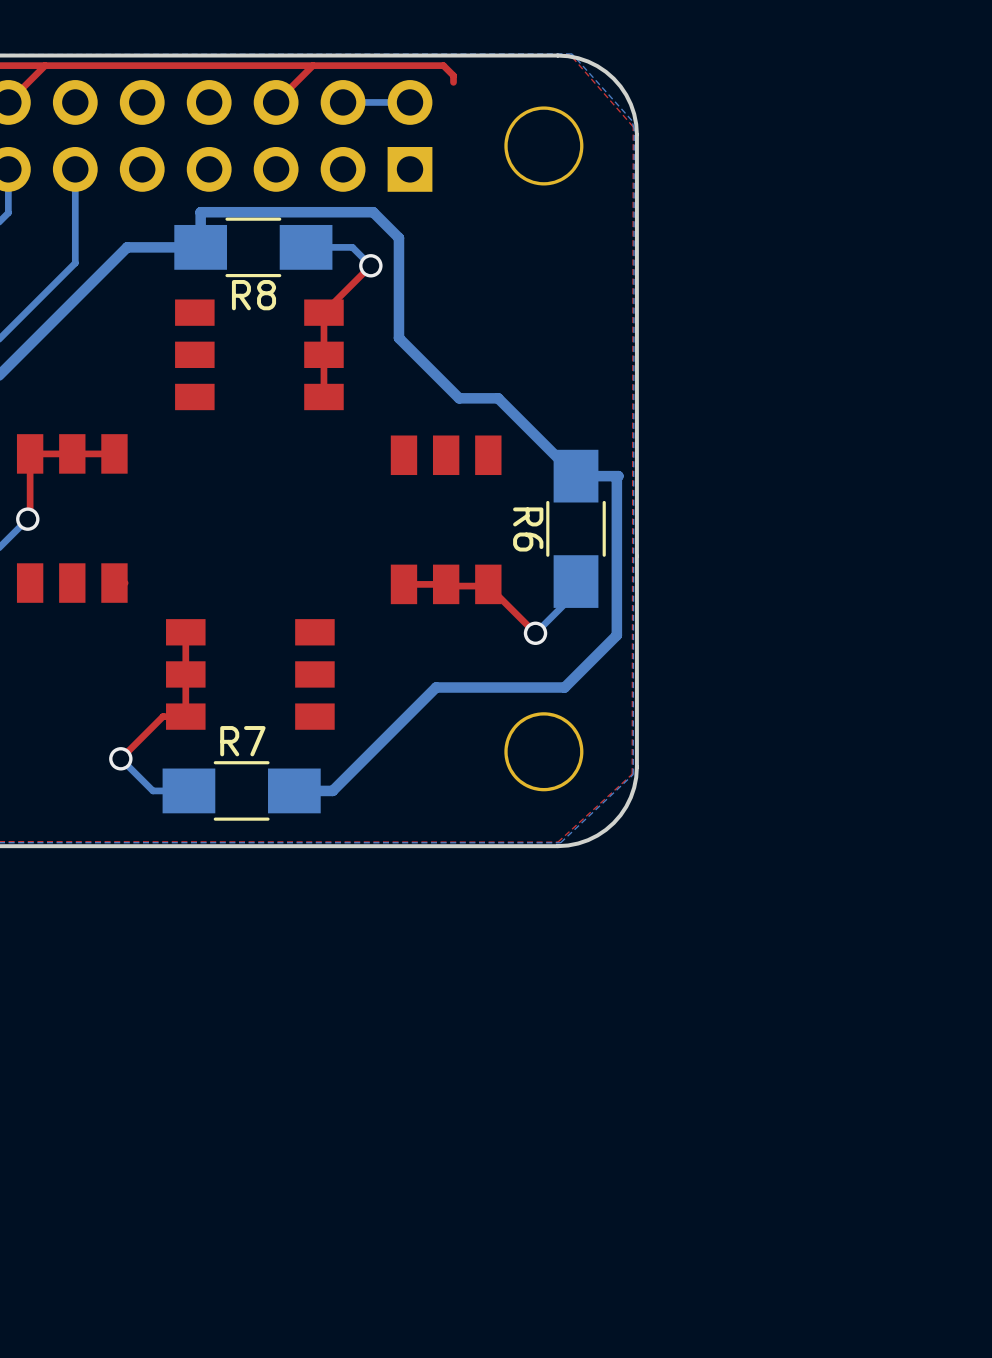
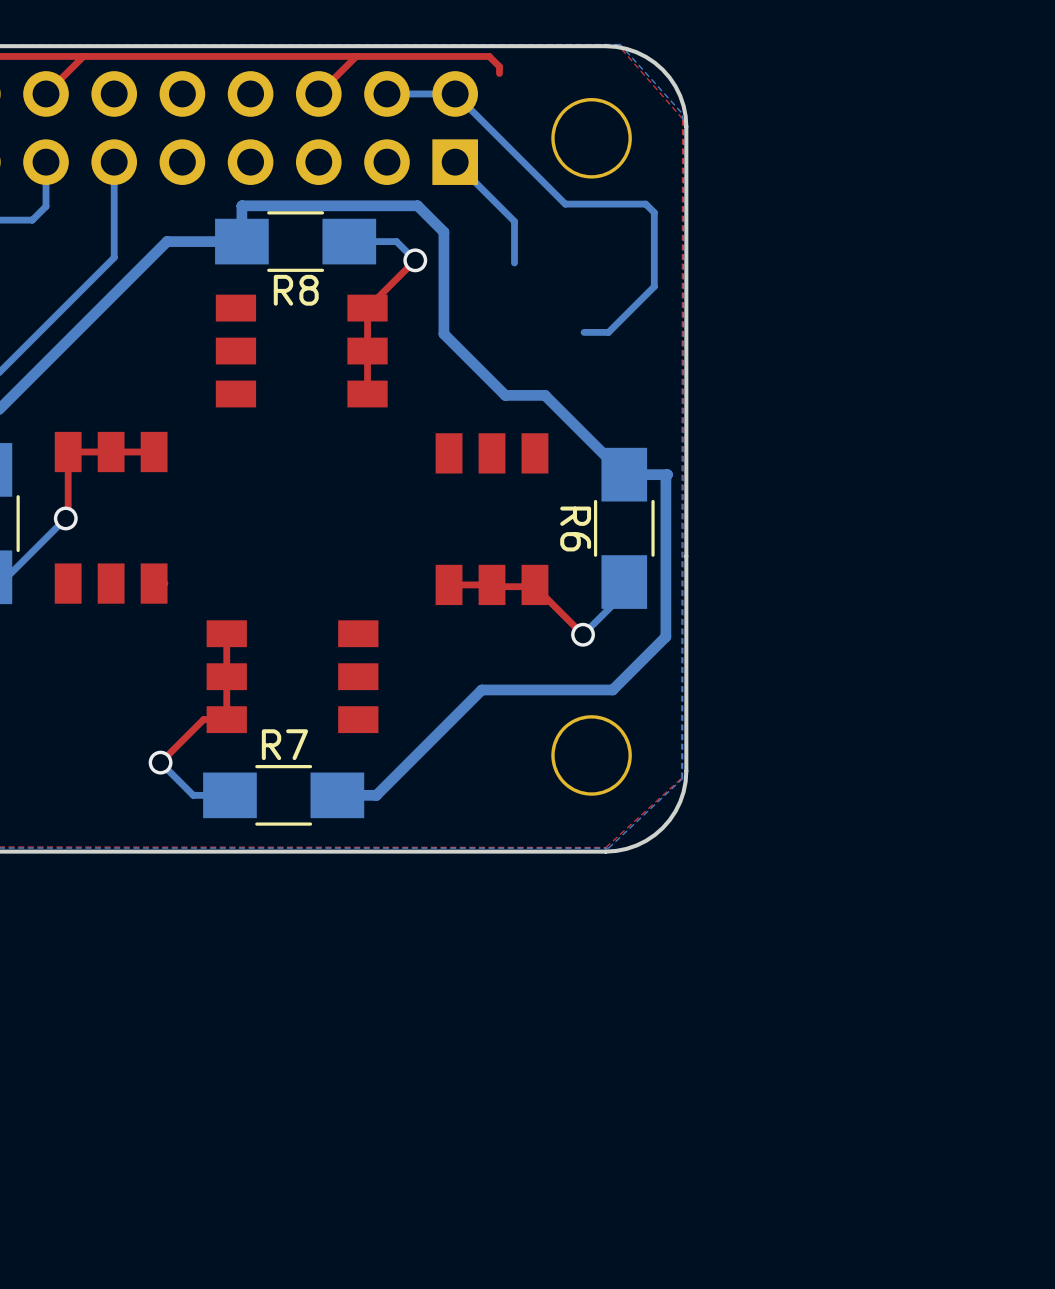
bottom track: none -> (455, 93) (565, 204) (645, 204) (654, 212) (654, 286) (608, 332) (584, 332)
bottom track: none -> (455, 162) (514, 221) (514, 262)

